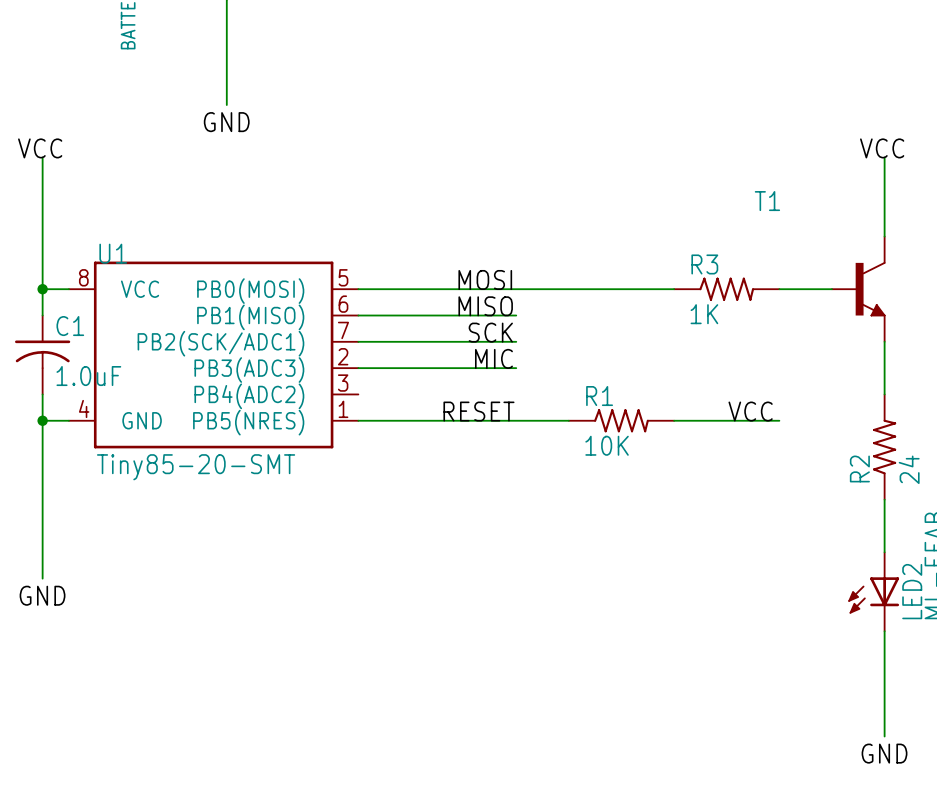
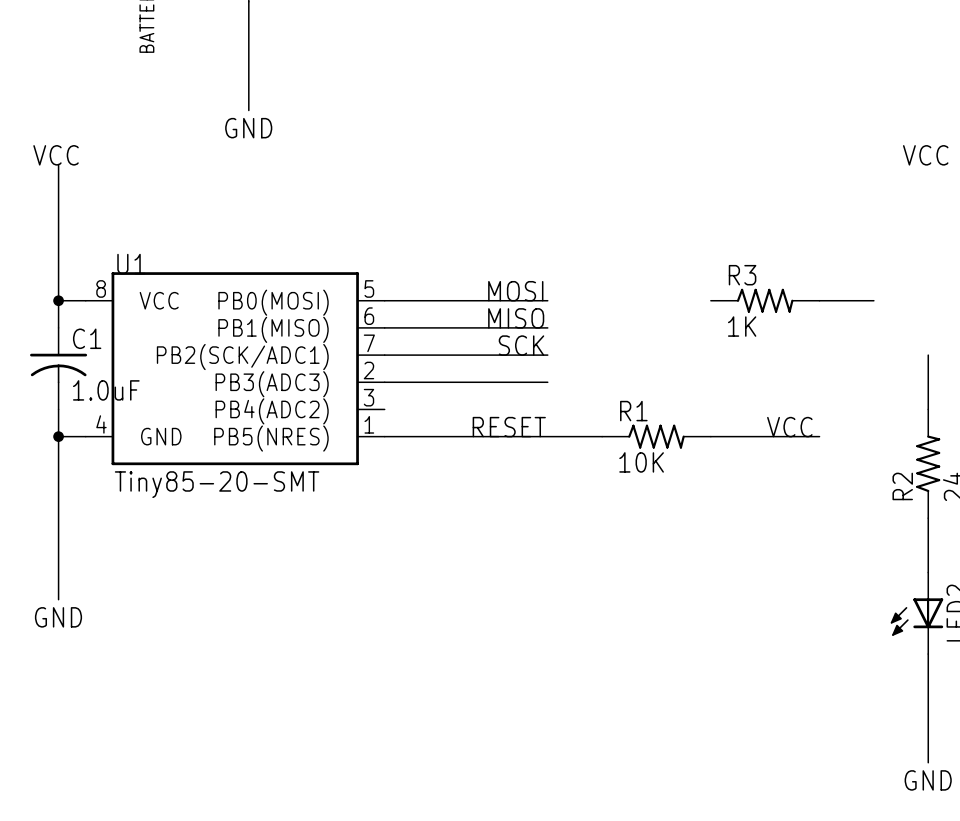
wire: (884, 157) (884, 236) -> none
wire: (516, 289) (674, 289) -> none
T1: (858, 289) -> none
label: MIC (493, 358) -> none

